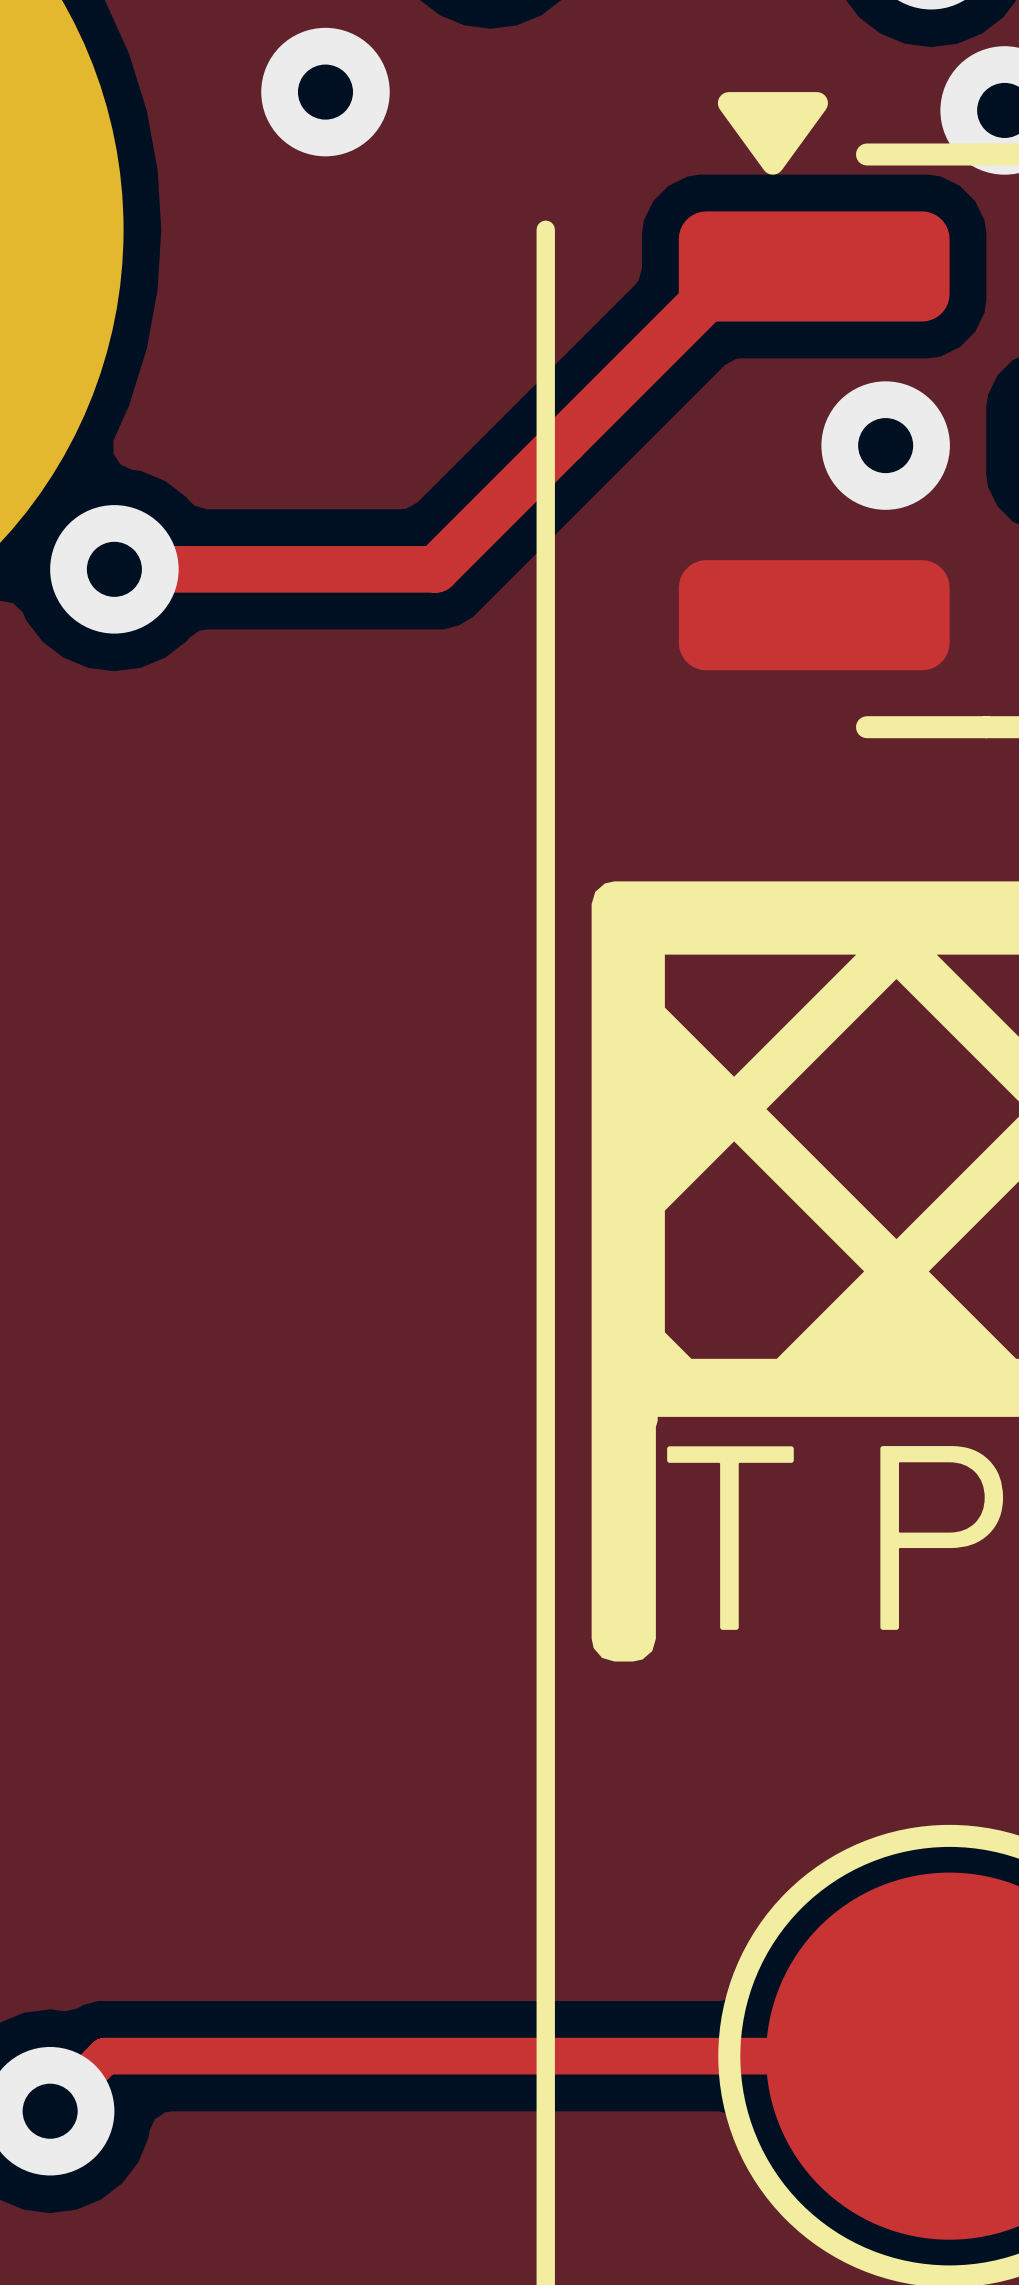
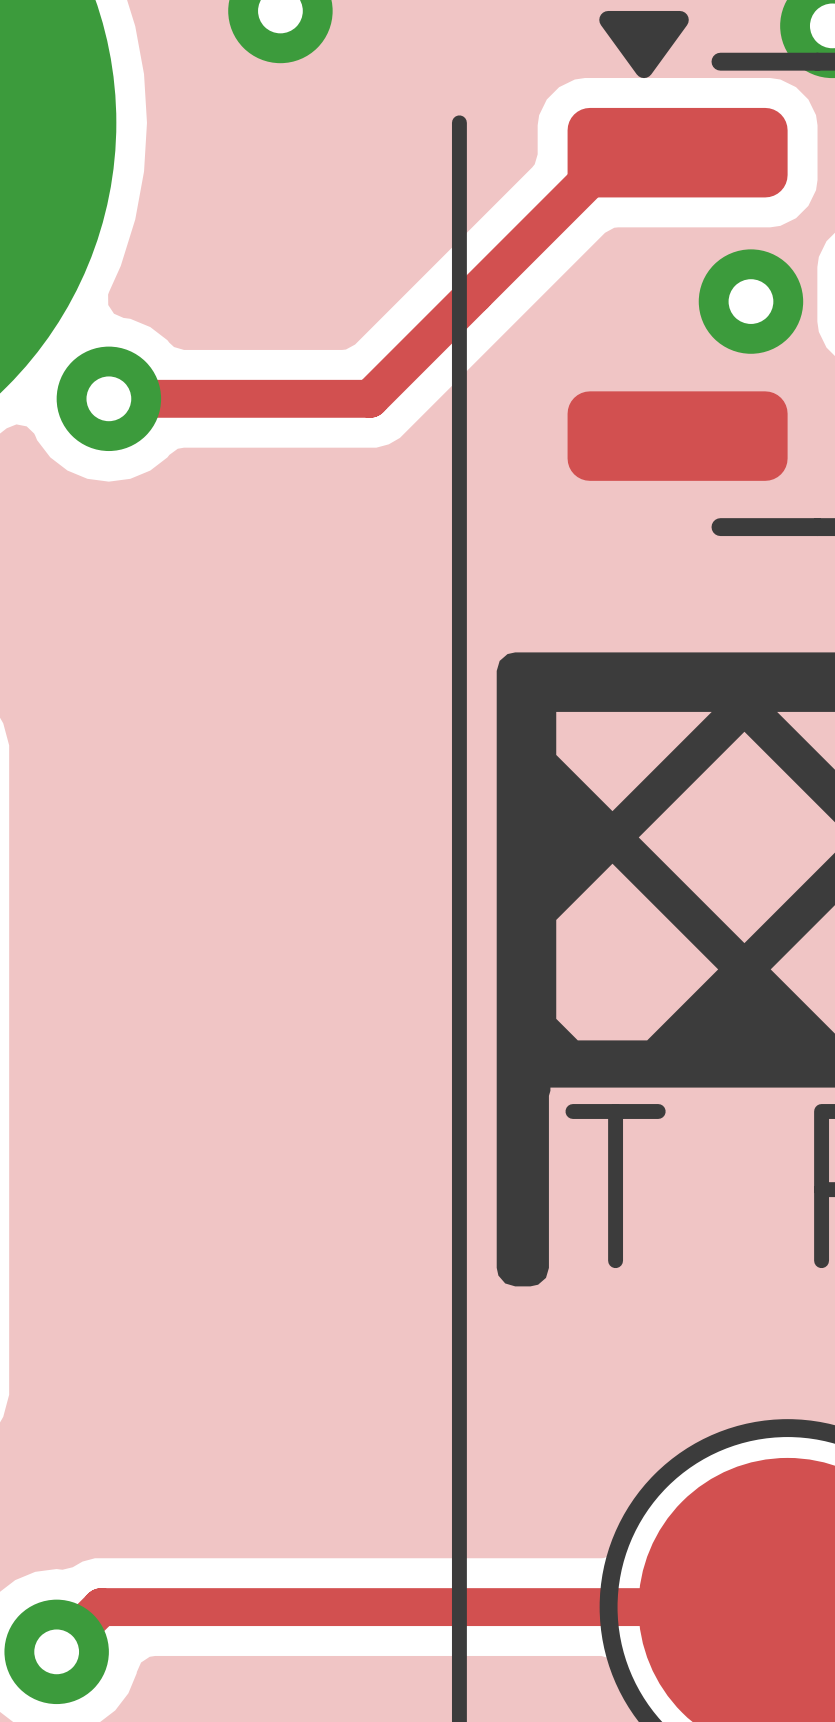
via position: (885, 445) -> (750, 301)
track width: thin (949, 2056) (105, 2056) (50, 2111) -> thick (787, 1607) (101, 1607) (56, 1651)

